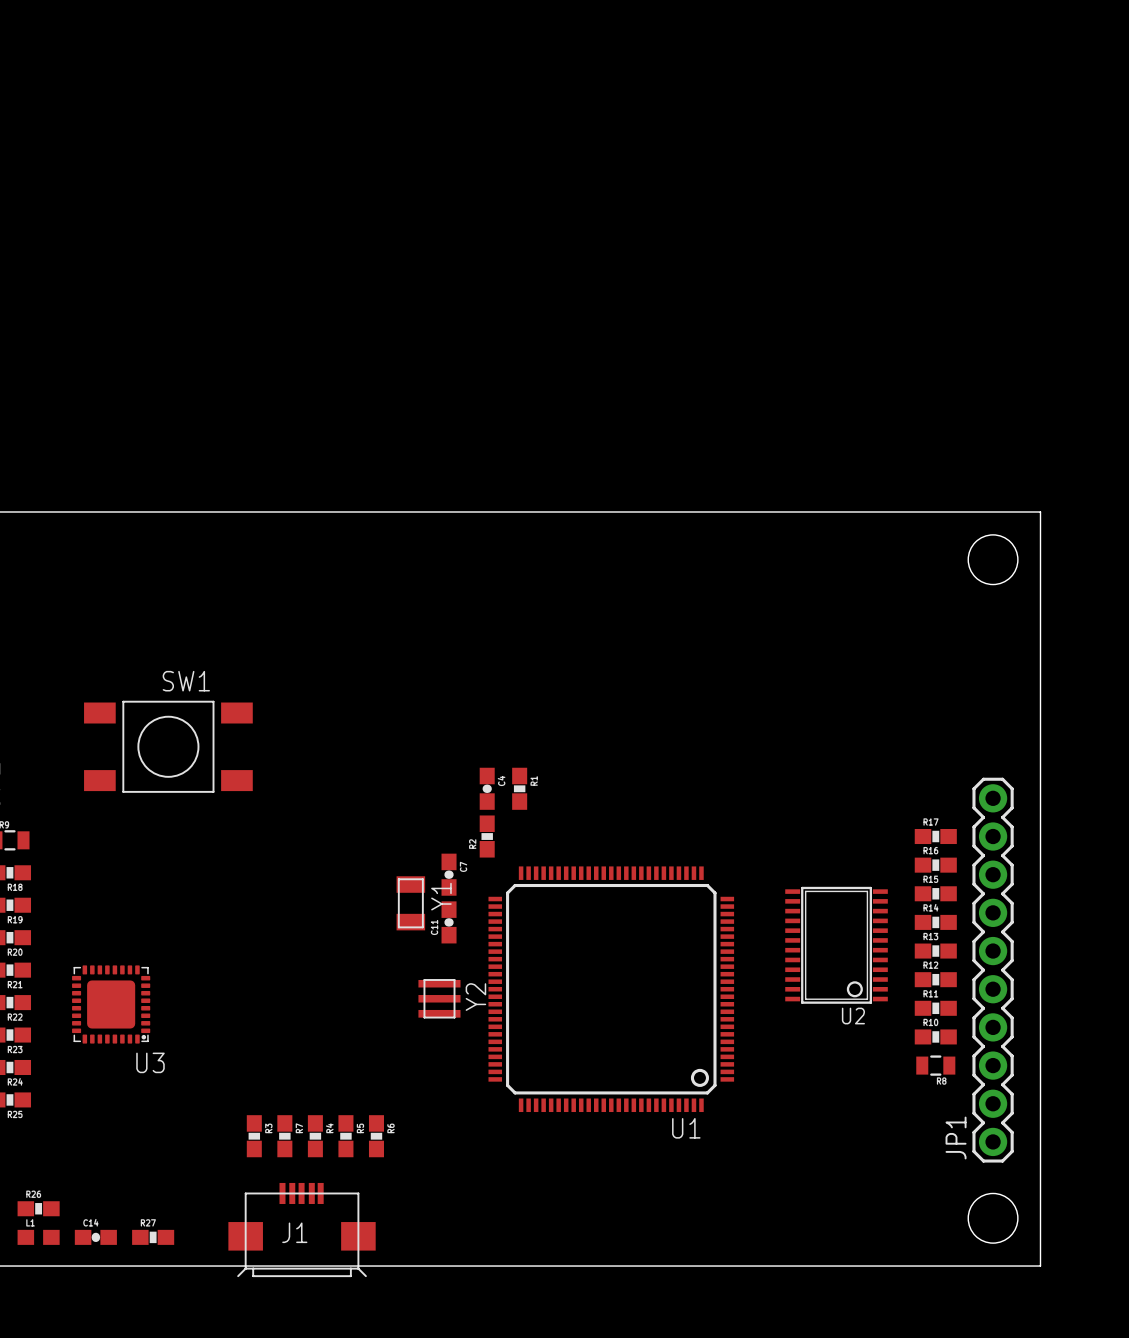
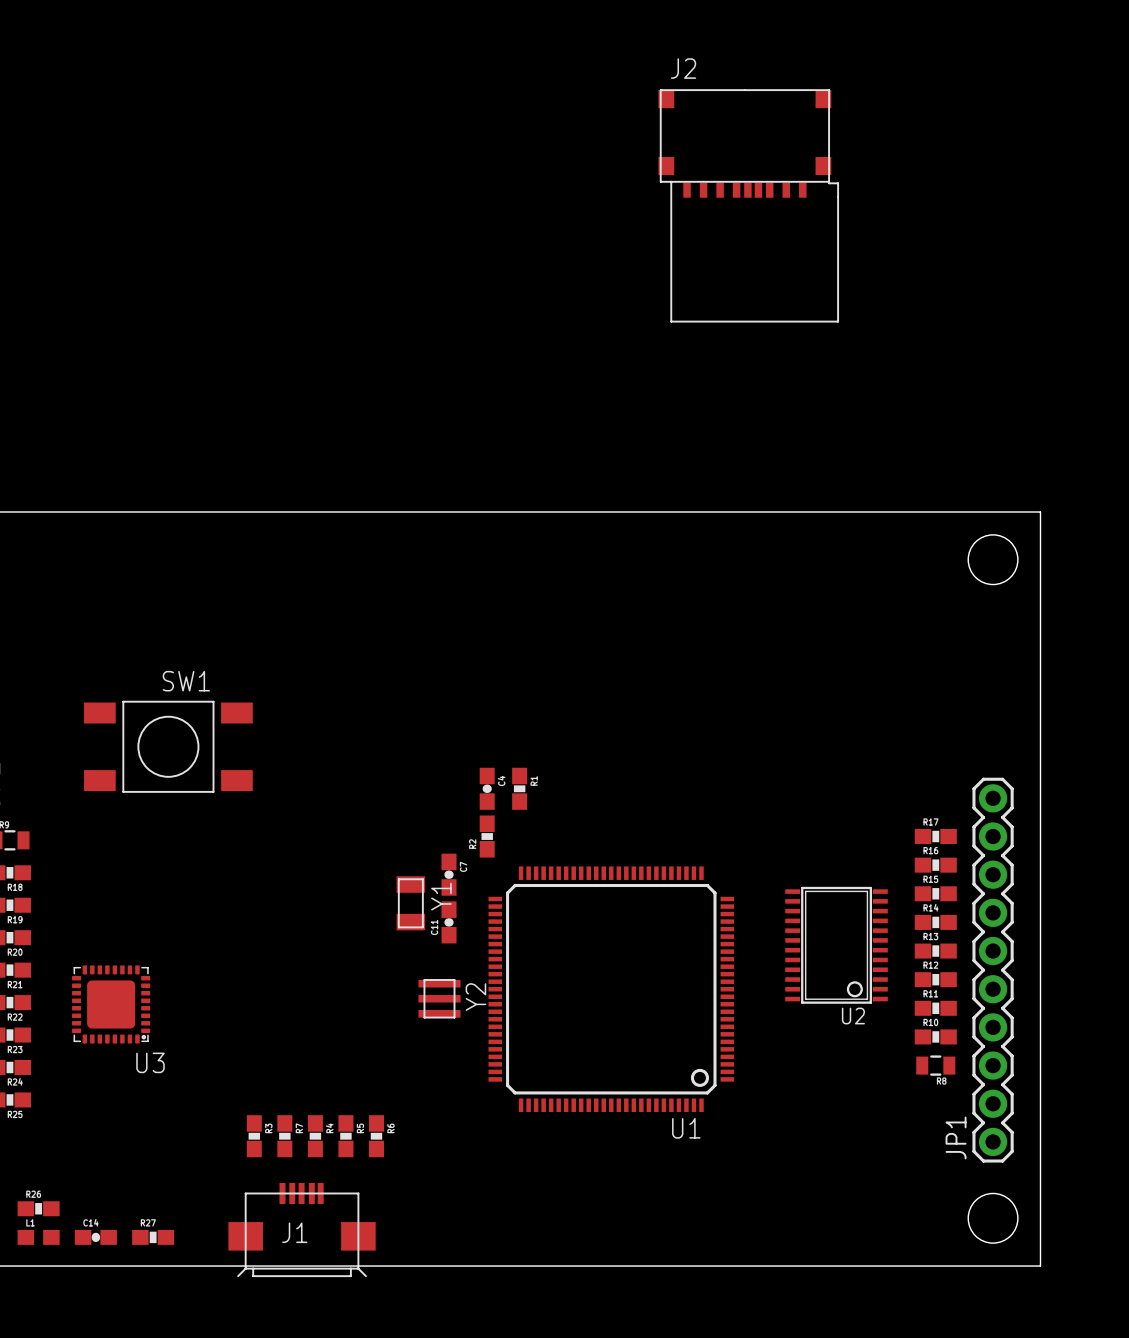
J2: none -> (748, 205)

